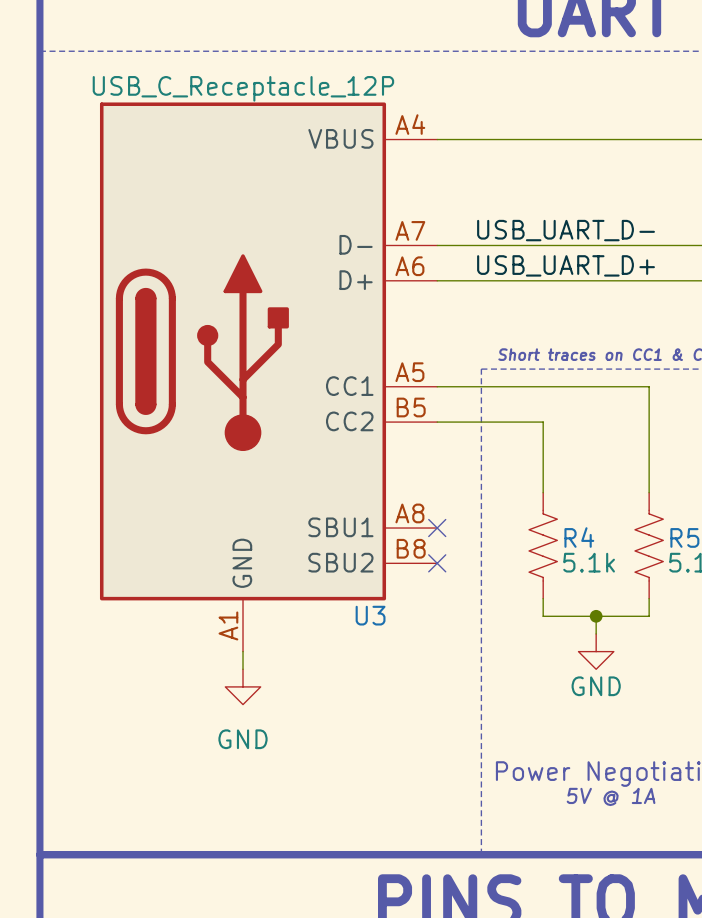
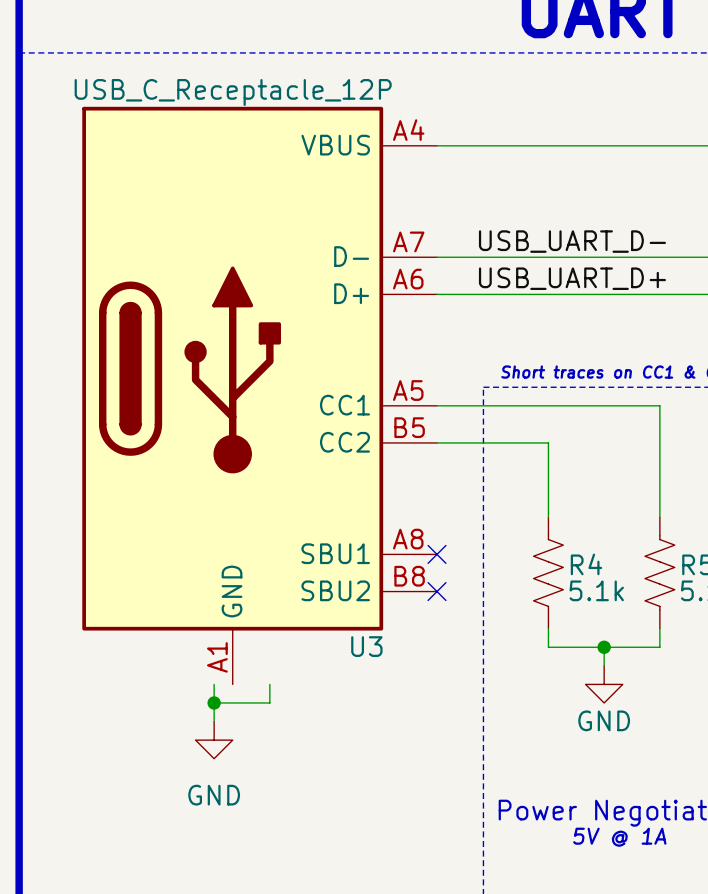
wire: none -> (214, 684) (214, 721)
wire: (243, 651) (243, 669) -> none
wire: none -> (269, 684) (269, 702) (214, 702)
junction: none -> (214, 702)
power symbol position: GND (243, 686) -> GND (214, 740)

